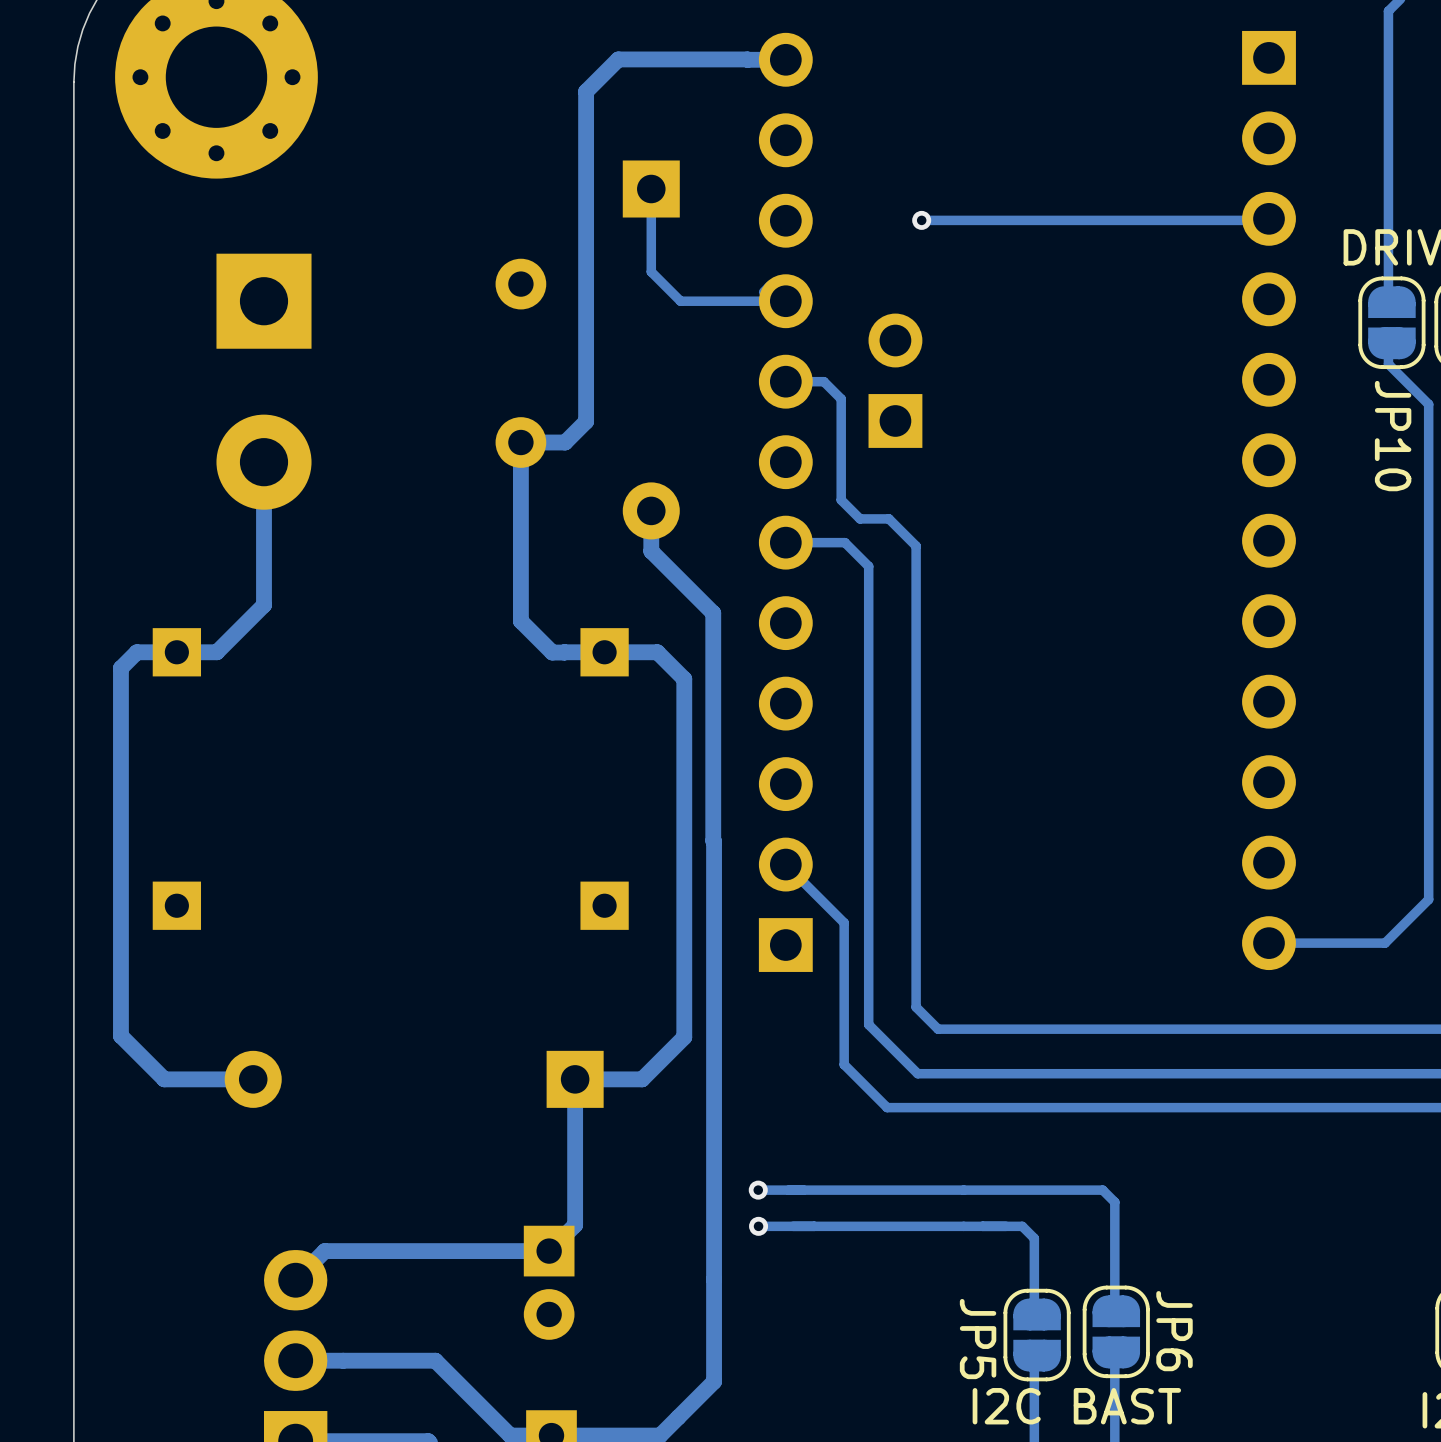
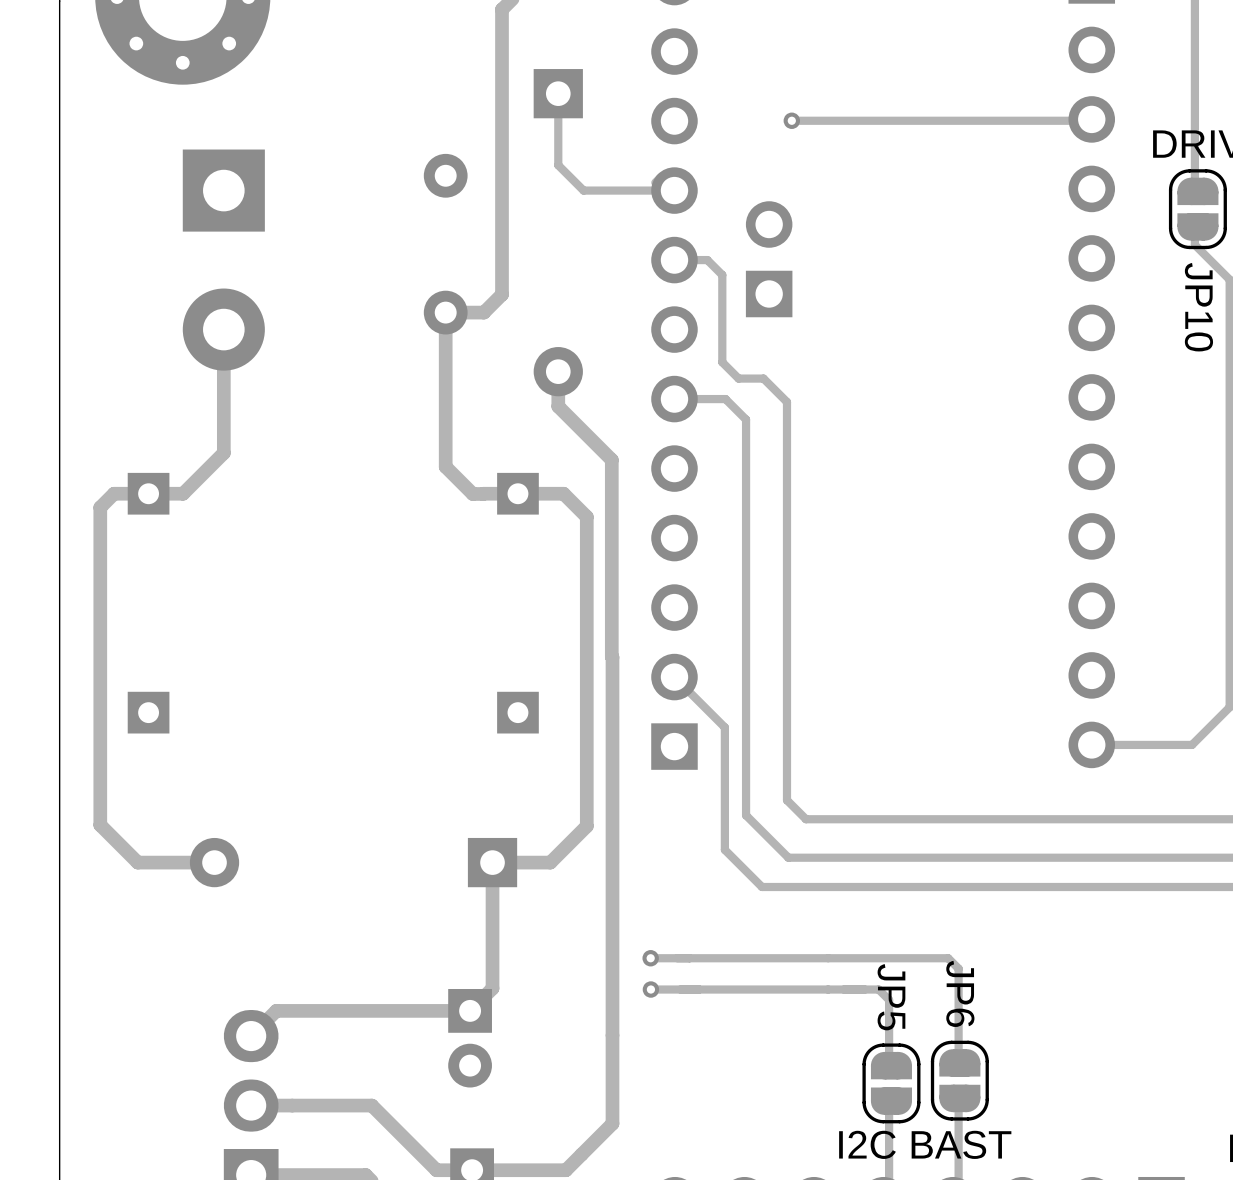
JP6 name position: JP6 (1174, 1331) -> JP6 (960, 993)
JP5 name position: JP5 (978, 1339) -> JP5 (891, 997)

